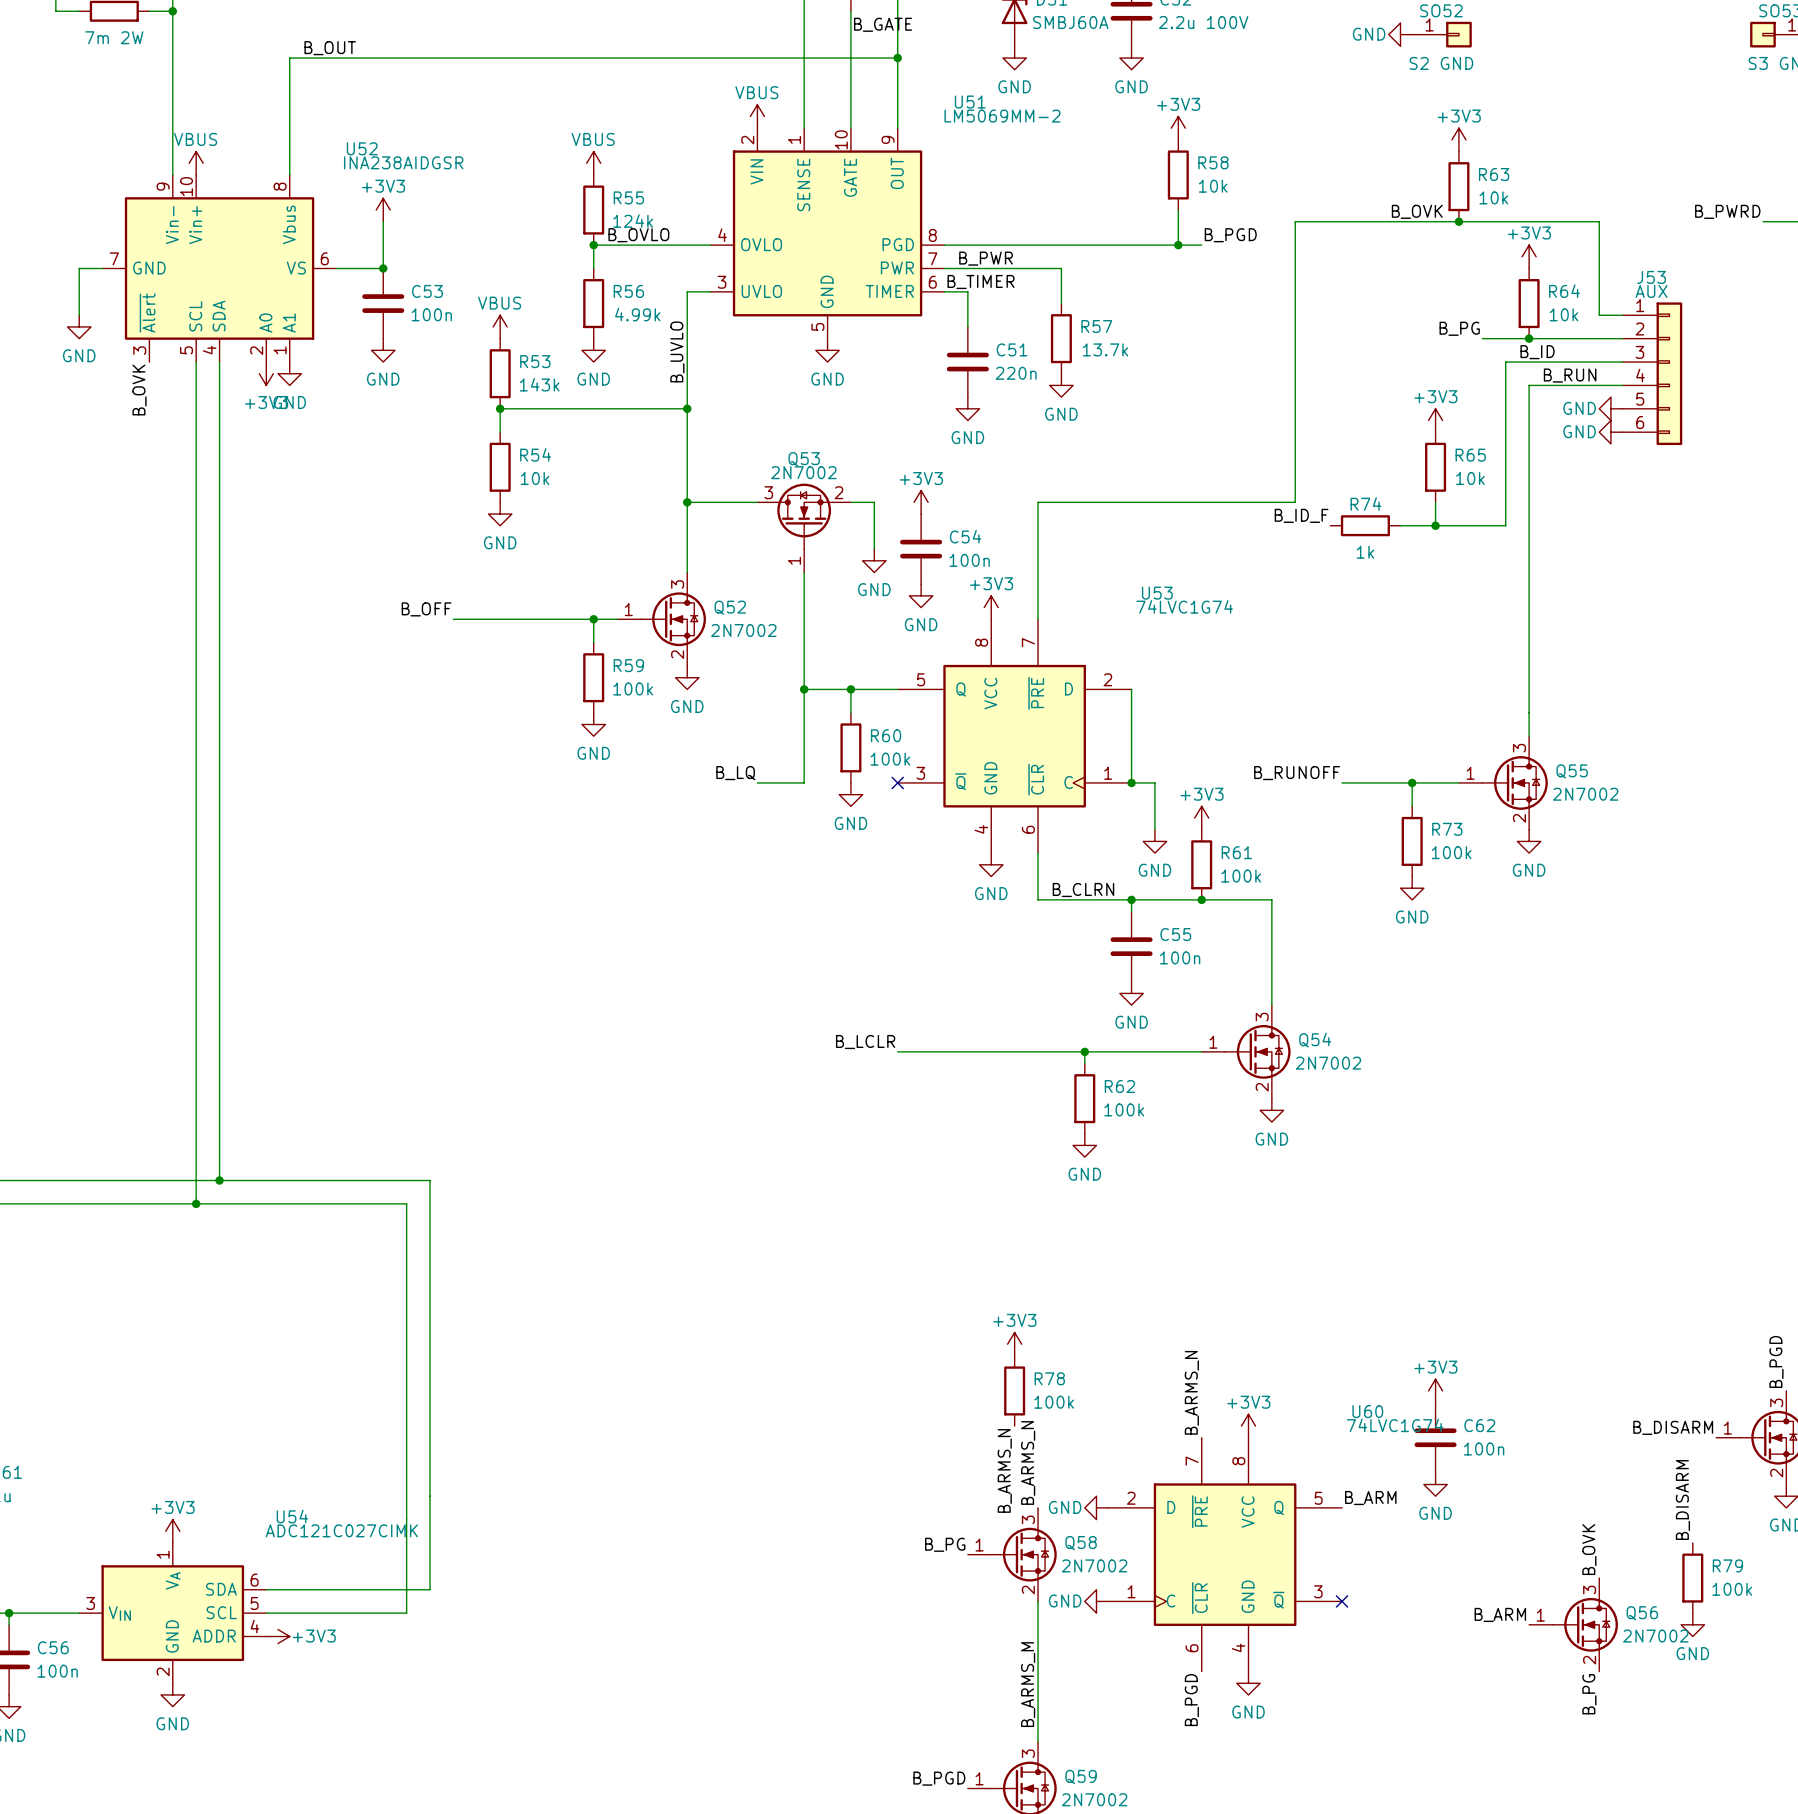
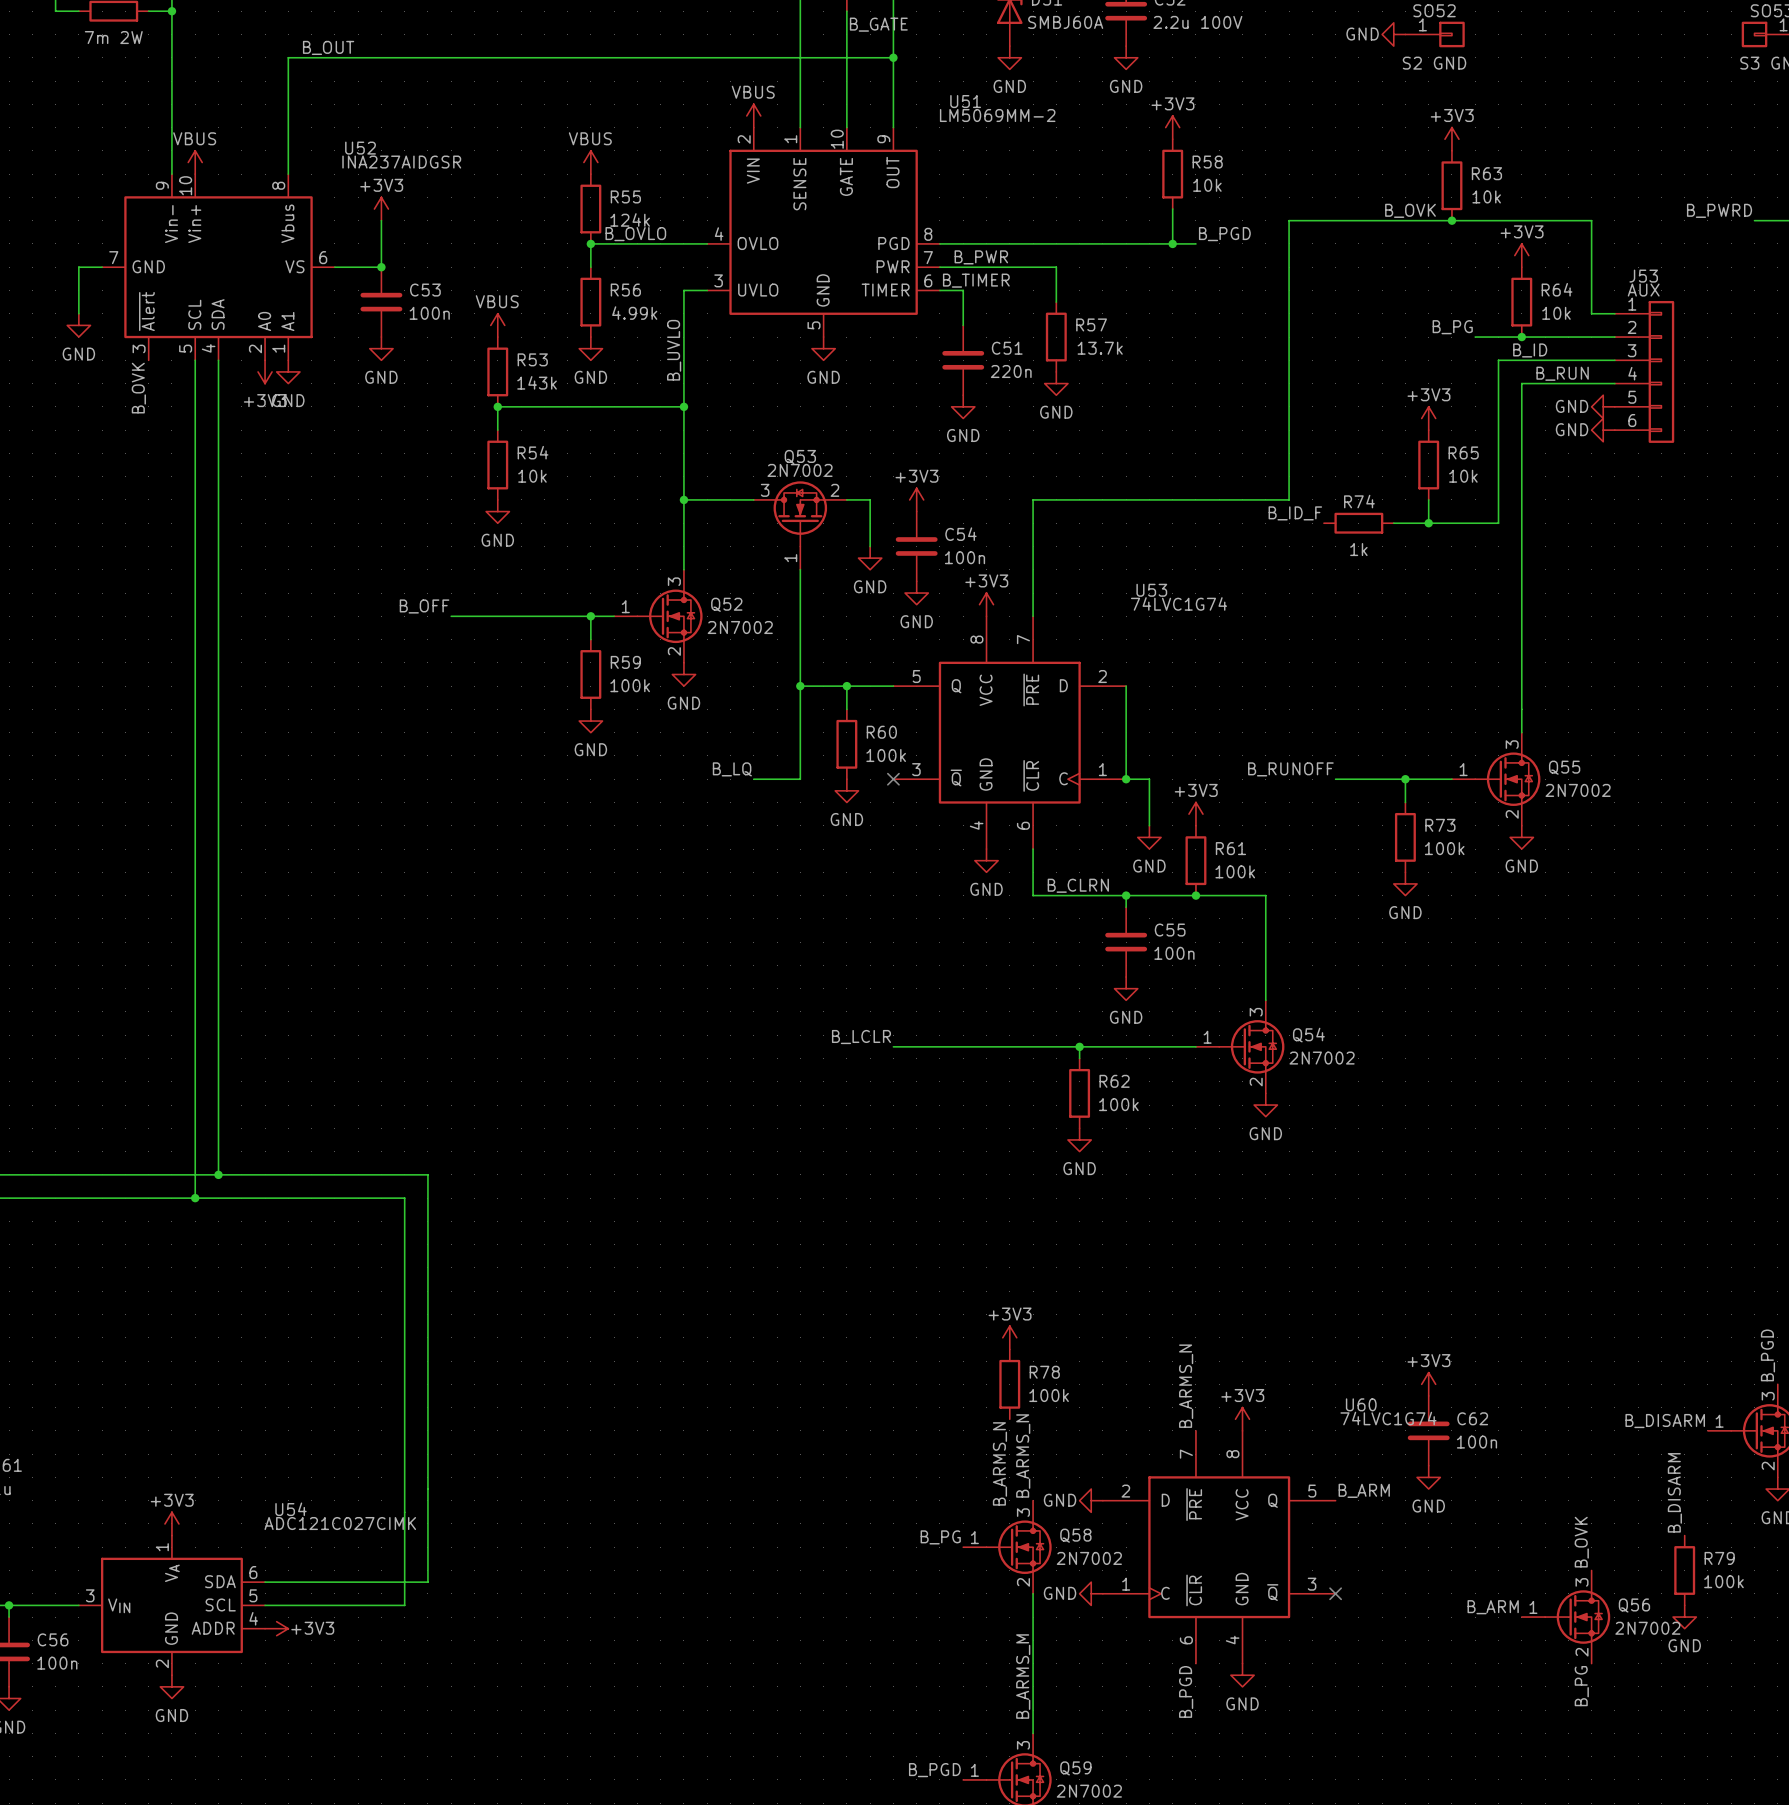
U52 value: INA238AIDGSR (403, 162) -> INA237AIDGSR (401, 162)

